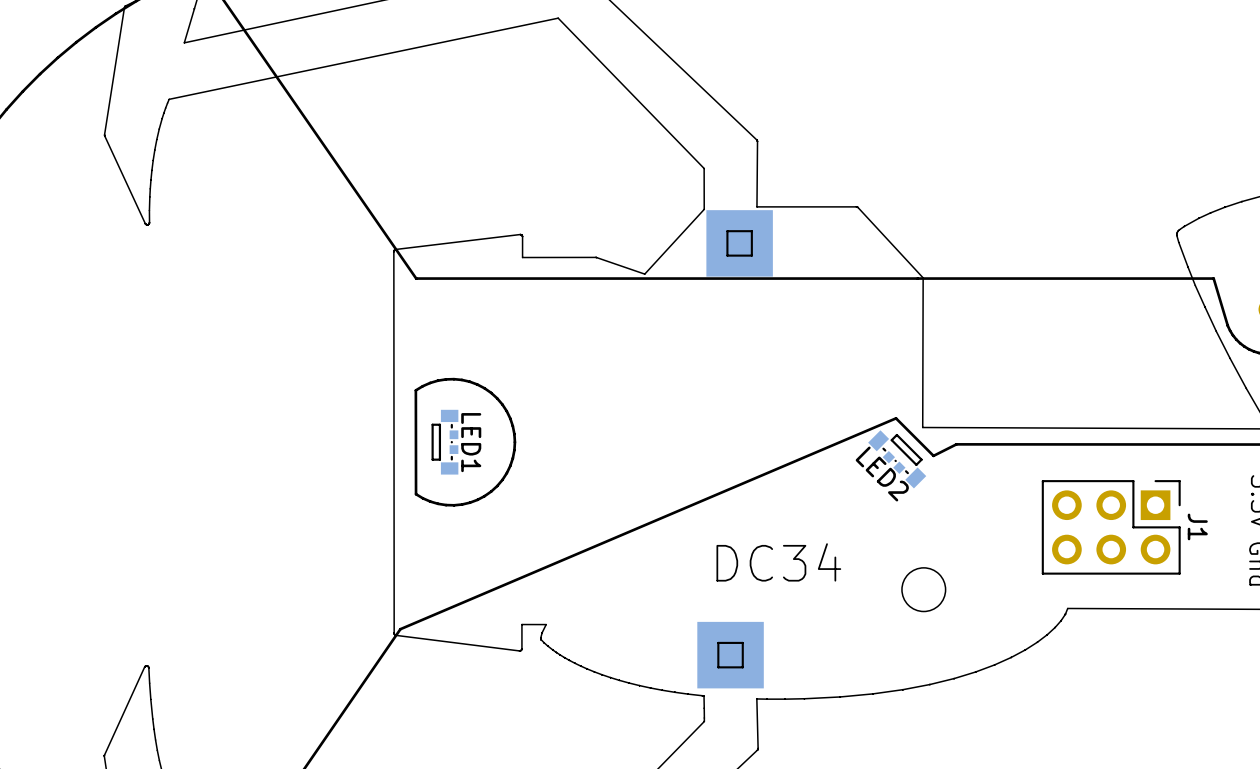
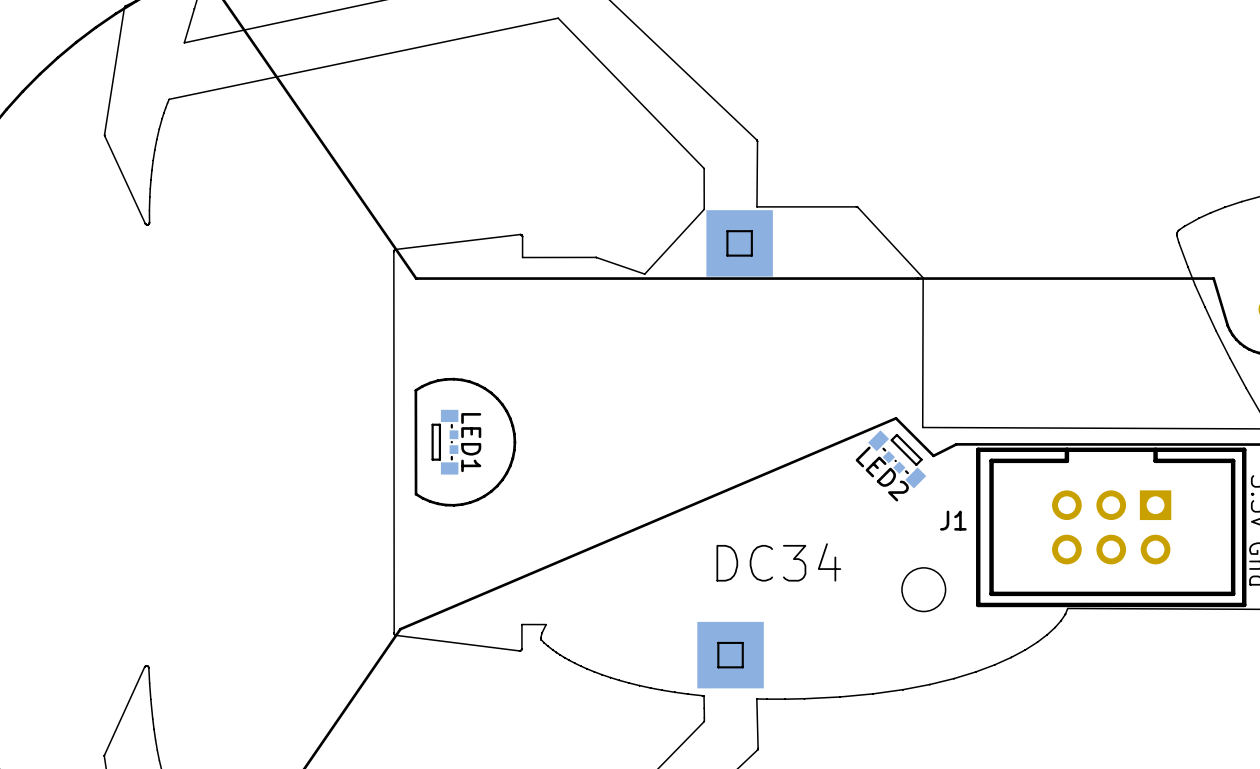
J1 footprint: [1041, 480, 1181, 575] -> [976, 447, 1247, 608]
J1 name position: J1 (1197, 526) -> J1 (953, 520)

